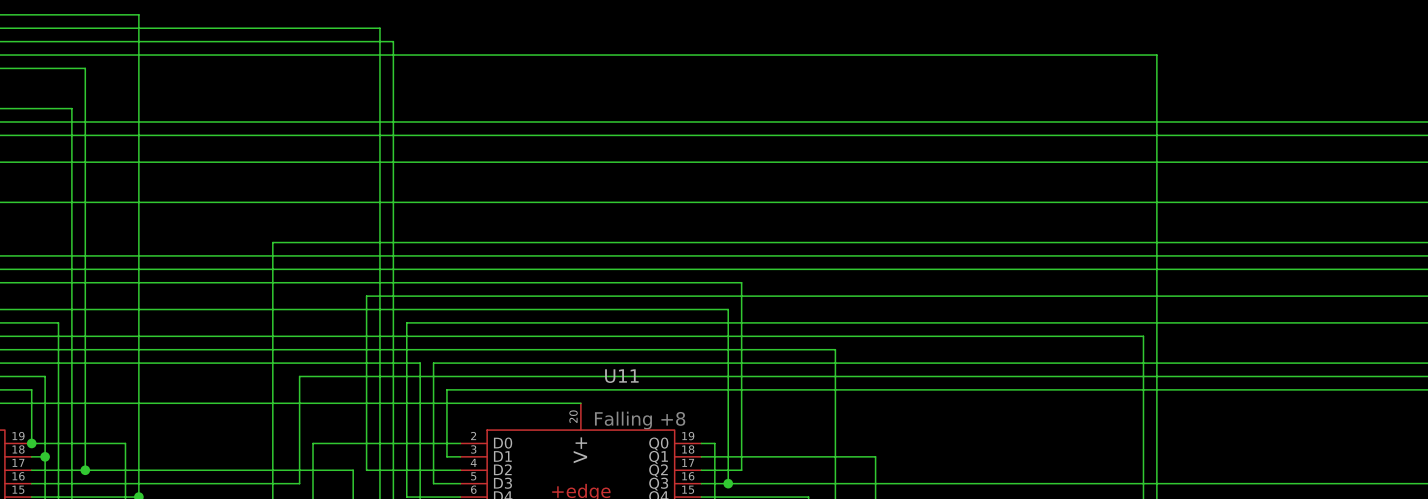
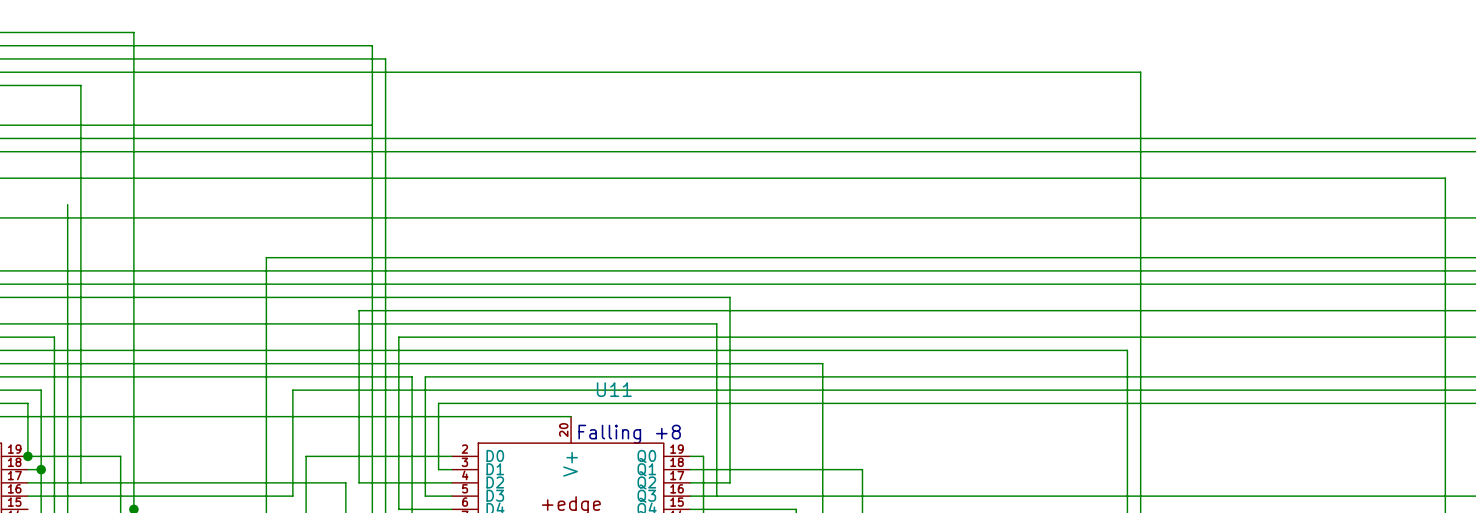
wire: (71, 108) (71, 188) -> (67, 125) (372, 125)
junction: (85, 470) -> none
junction: (728, 483) -> none
wire: (31, 497) (138, 497) -> none

